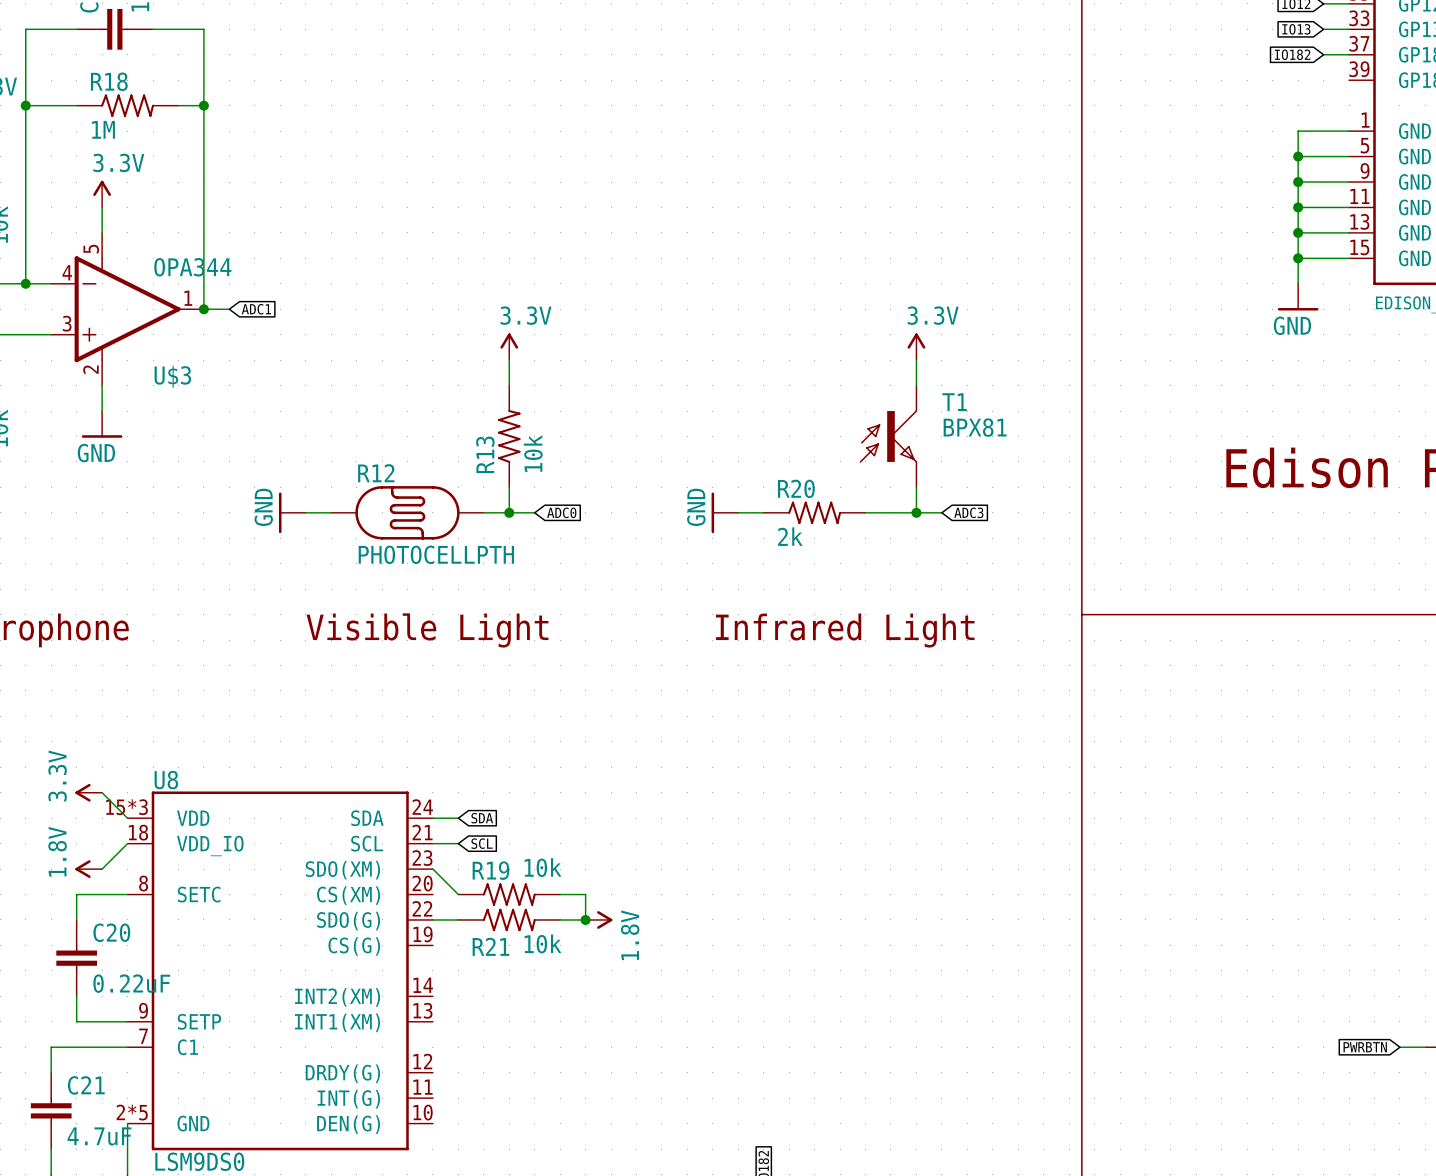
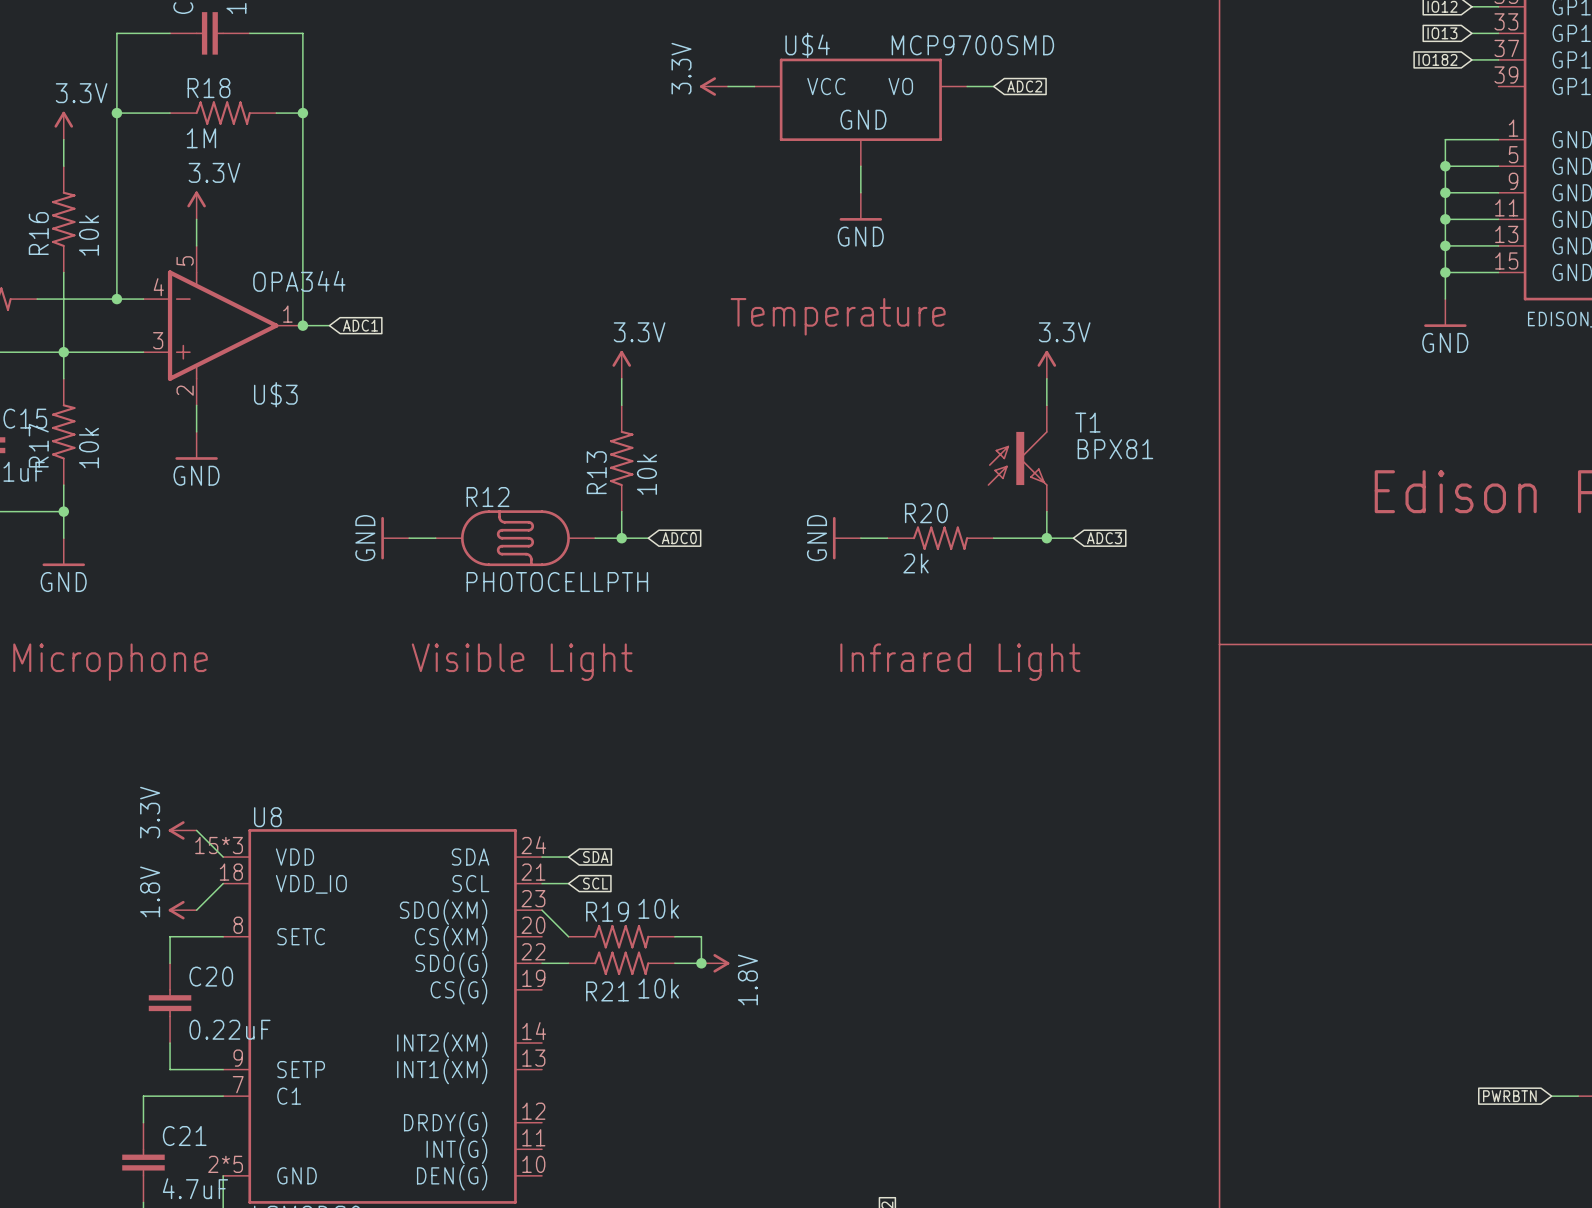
power symbol: none -> 3.3V (714, 86)
wire: none -> (727, 86) (754, 86)
wire: none -> (967, 86) (993, 86)
global label: none -> ADC2 (1024, 86)
U$4: none -> MCP9700SMD (860, 112)
wire: none -> (860, 166) (860, 192)
power symbol: none -> GND (860, 206)
text: none -> Temperature (838, 316)

